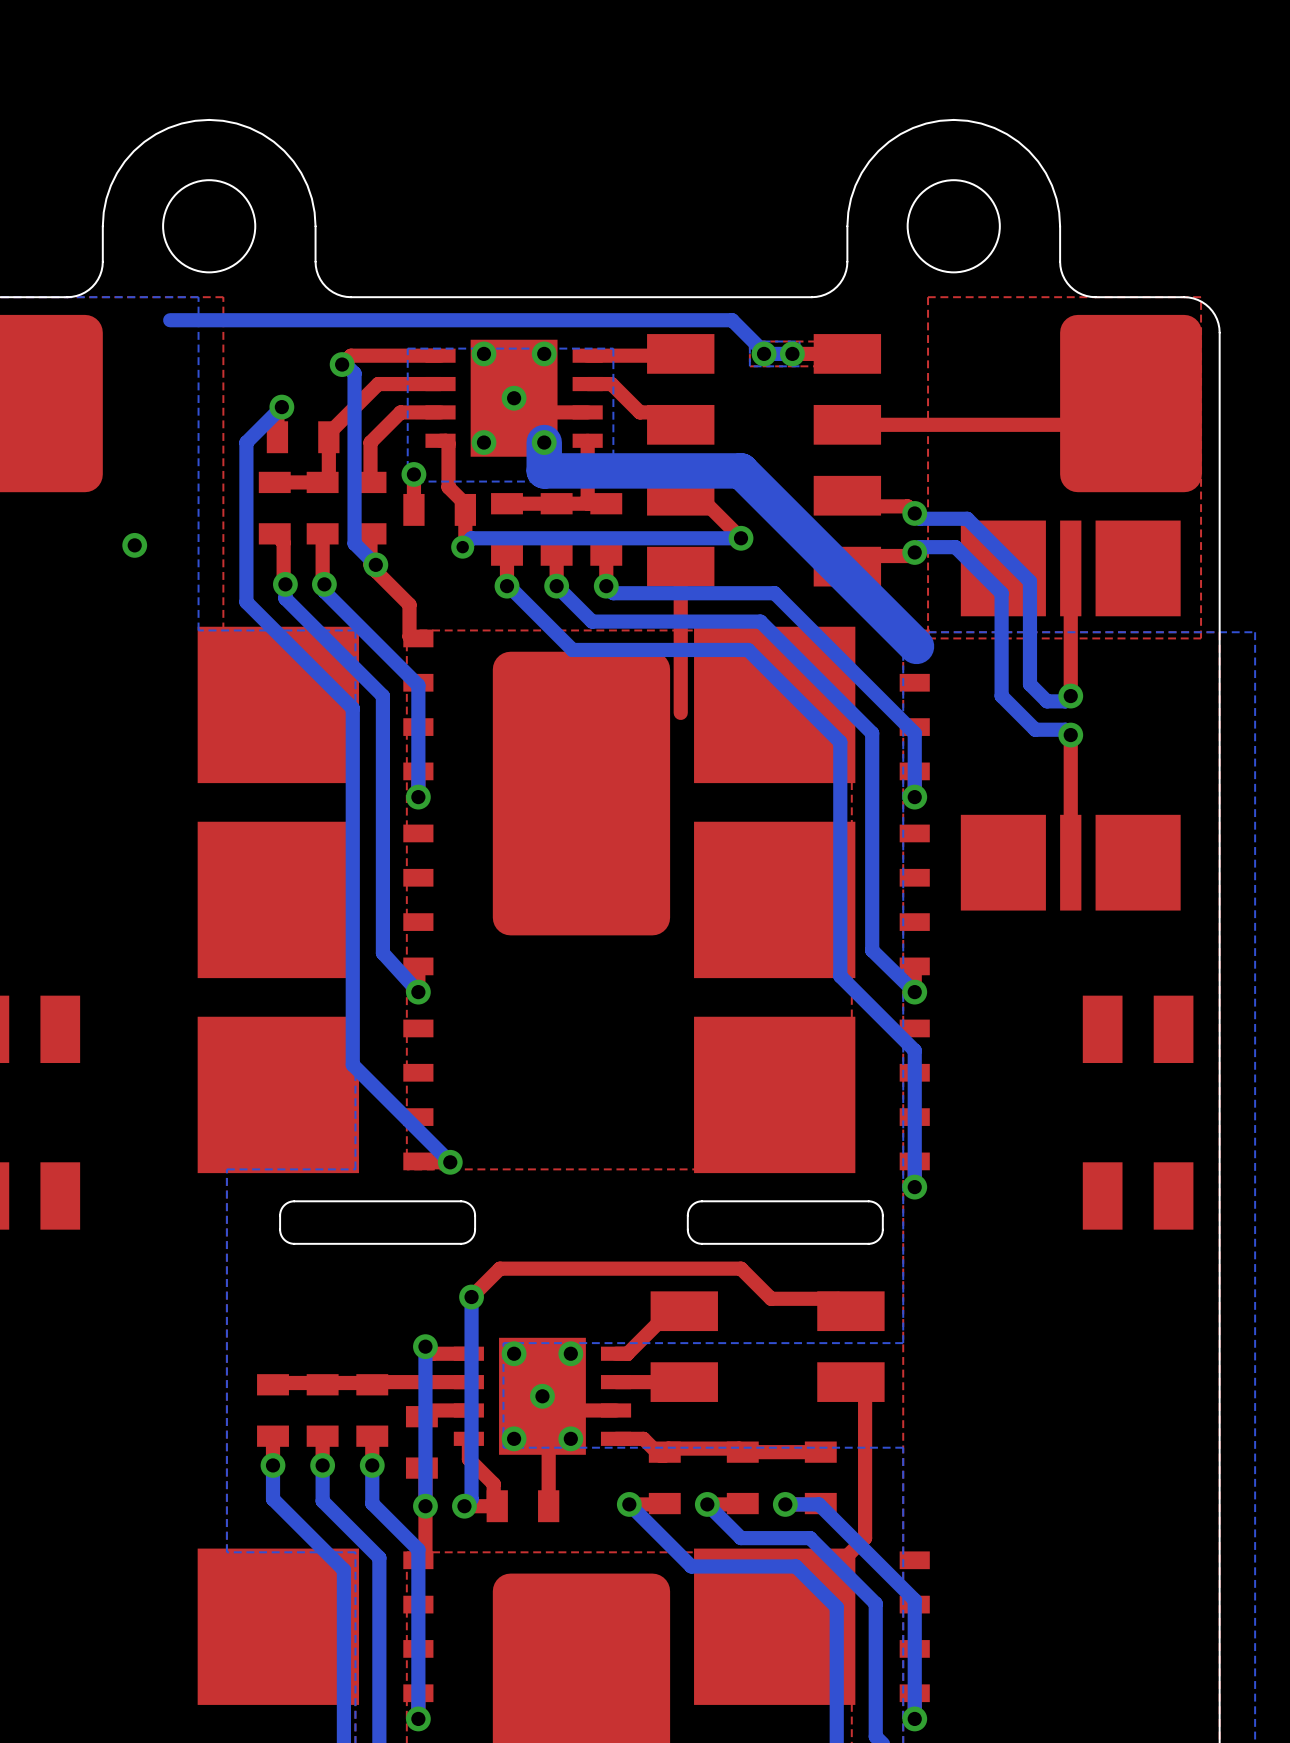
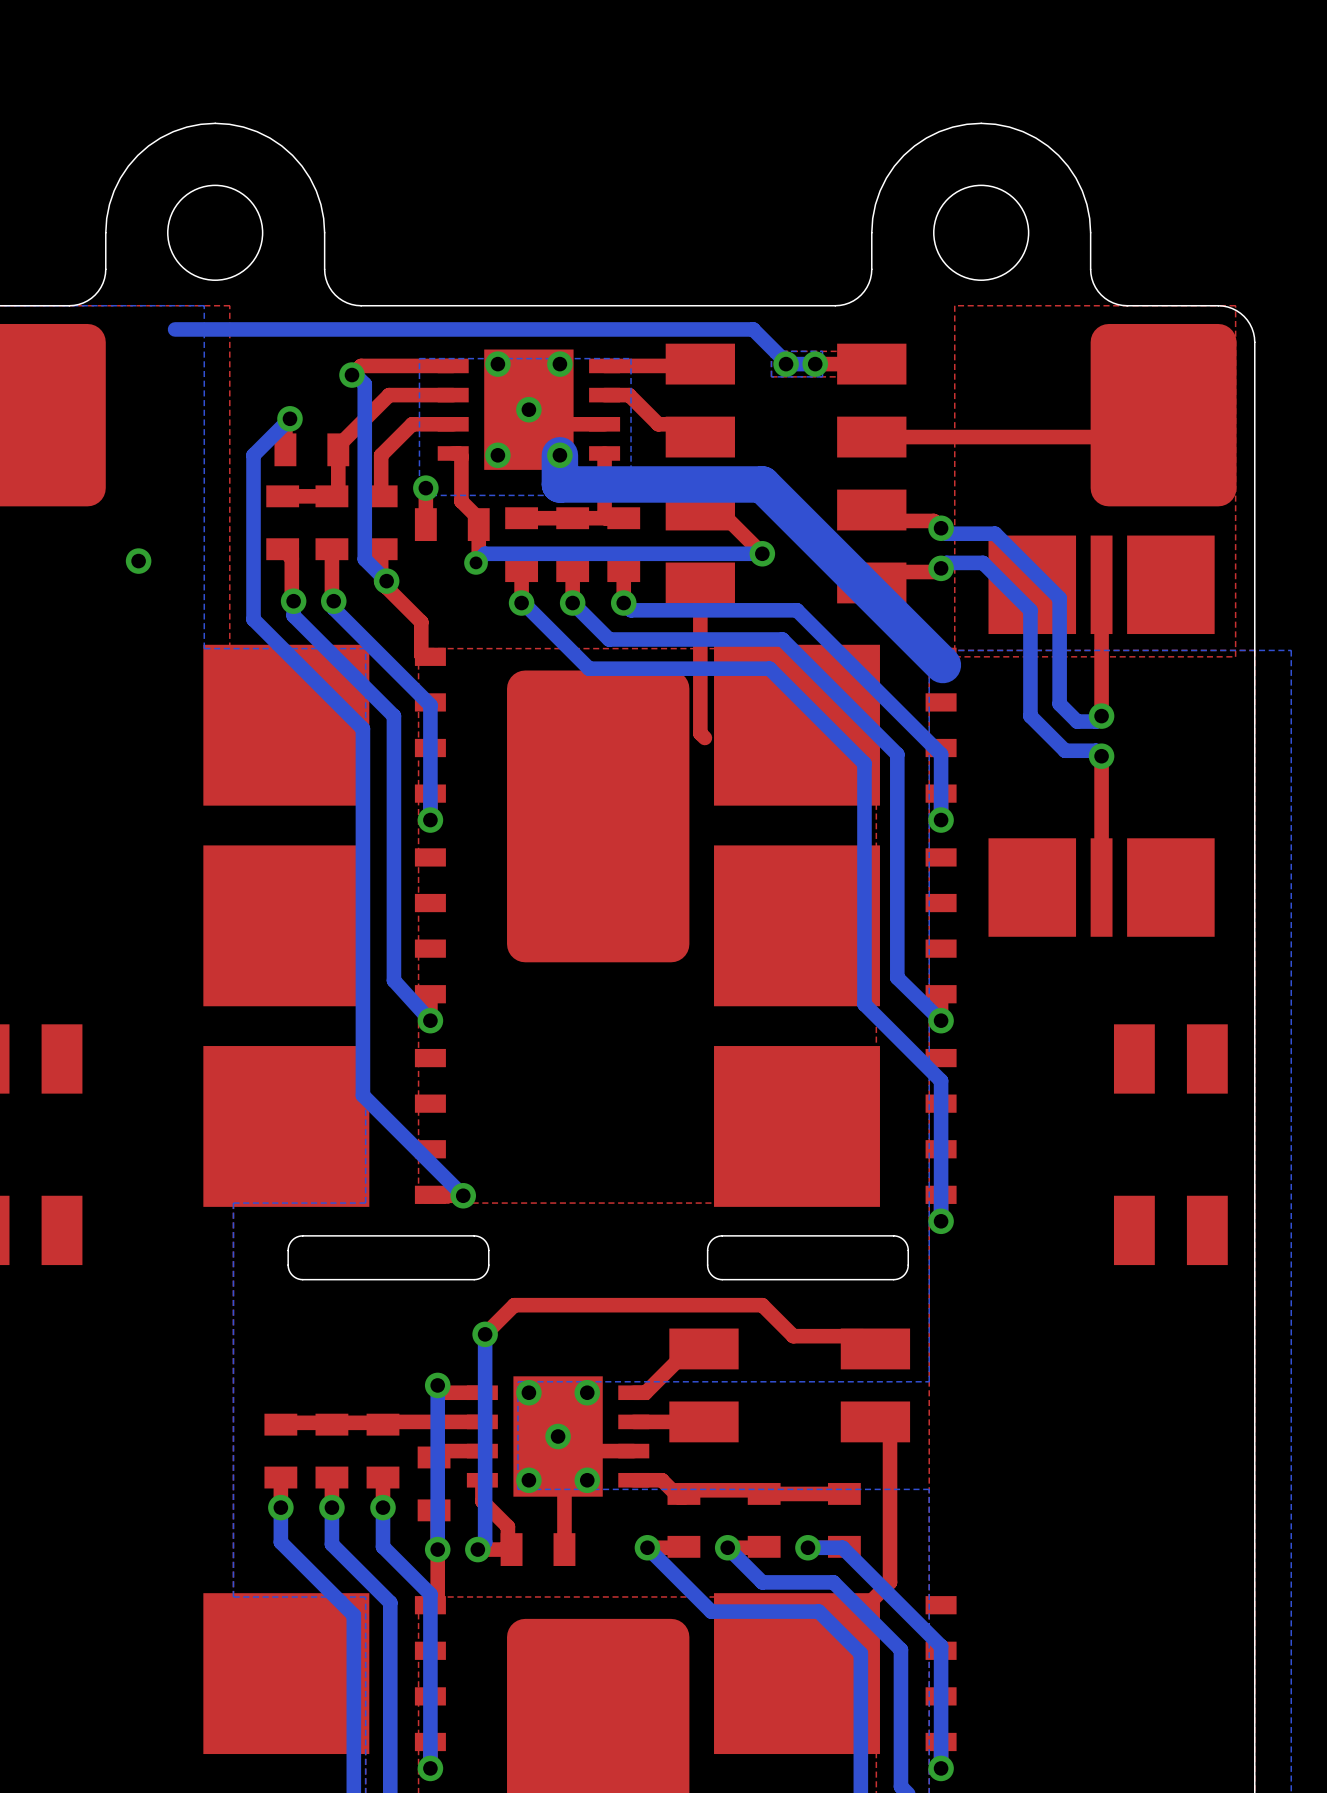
top track: none -> (700, 733) (704, 737)

